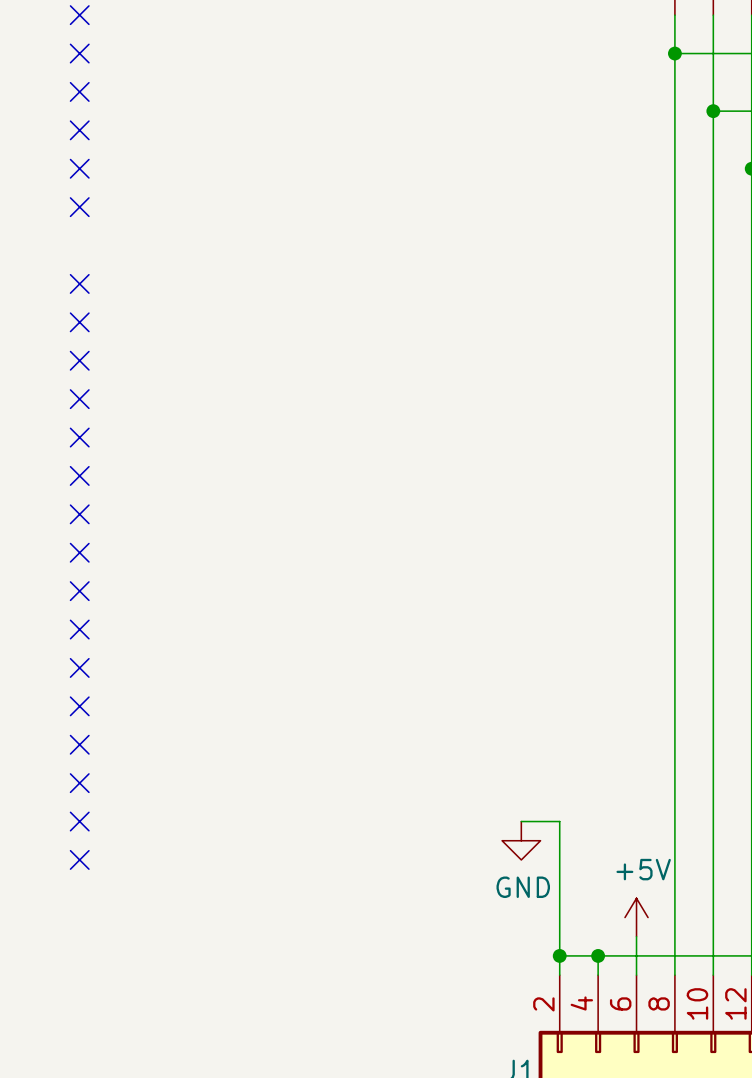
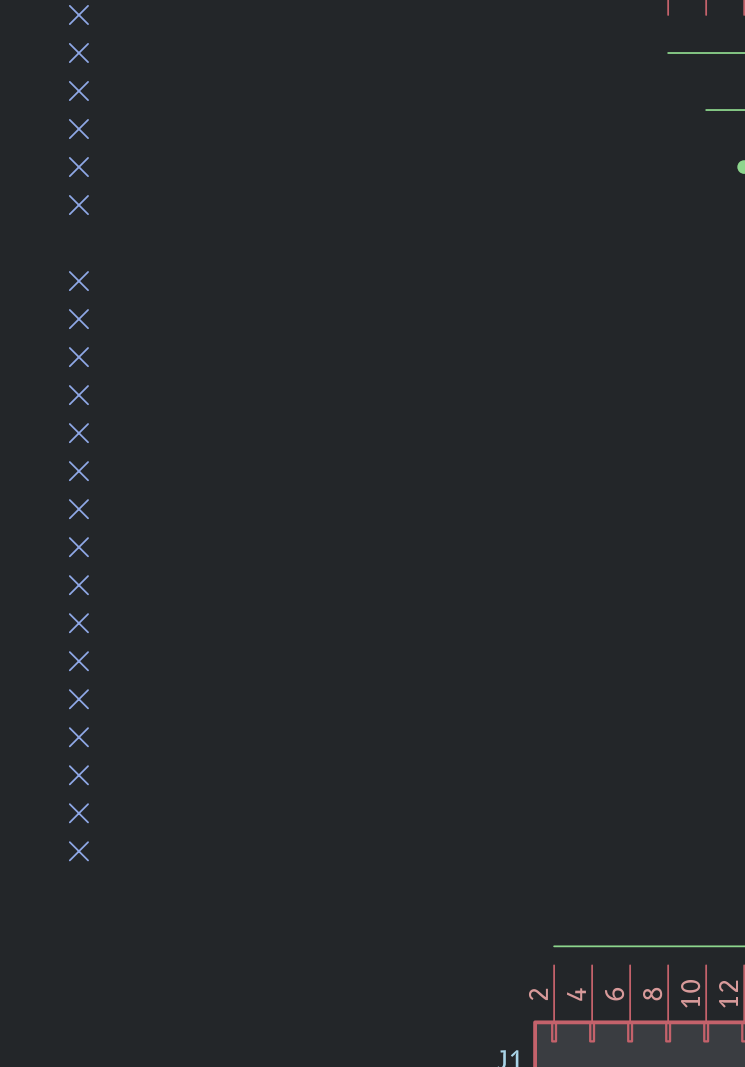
wire: (674, 15) (674, 975) -> none
wire: (713, 15) (713, 975) -> none
wire: (751, 15) (751, 975) -> none
junction: (674, 53) -> none
junction: (713, 111) -> none
wire: (521, 821) (559, 821) (559, 975) -> none
power symbol: GND (521, 840) -> none
power symbol: +5V (636, 917) -> none
wire: (636, 936) (636, 975) -> none
junction: (559, 955) -> none
wire: (598, 955) (598, 975) -> none
junction: (598, 955) -> none

